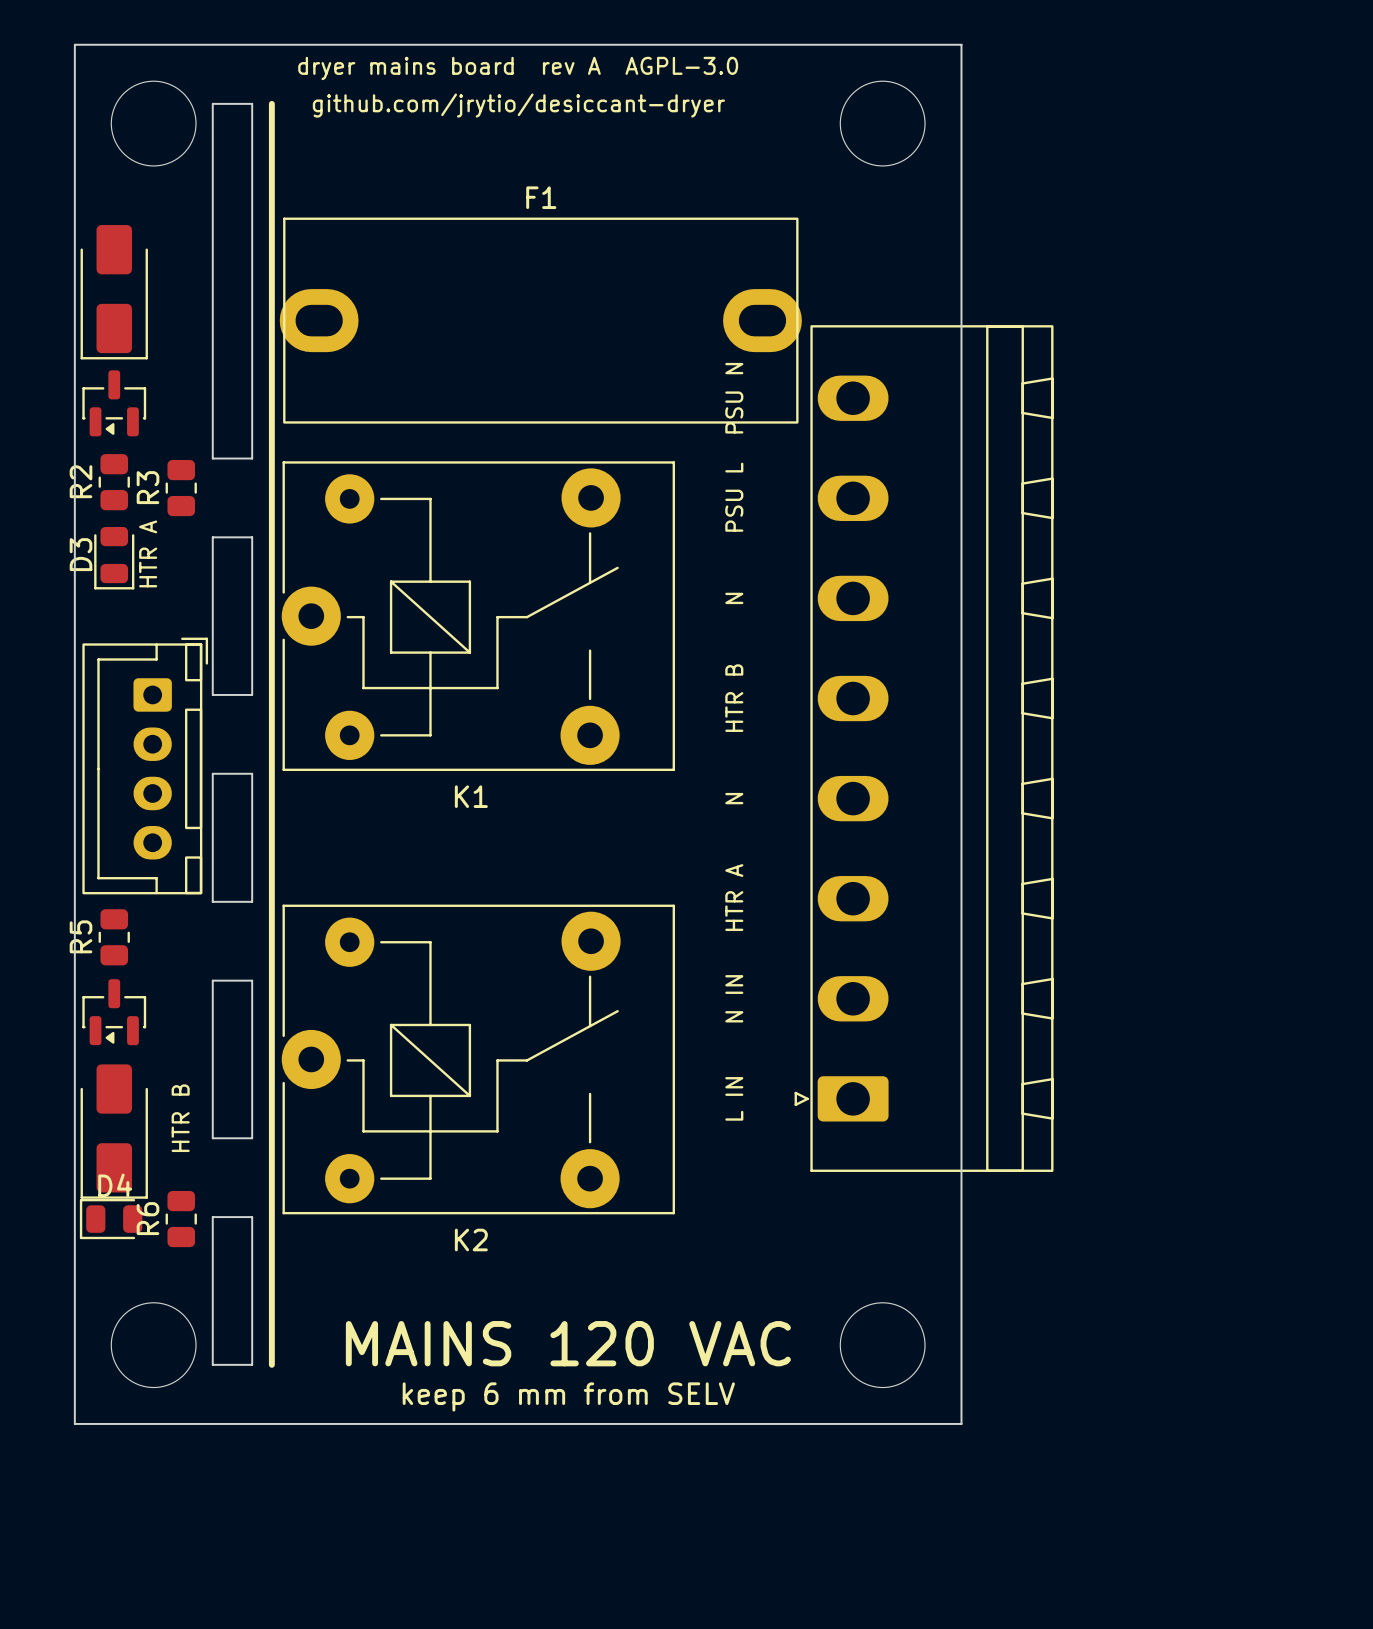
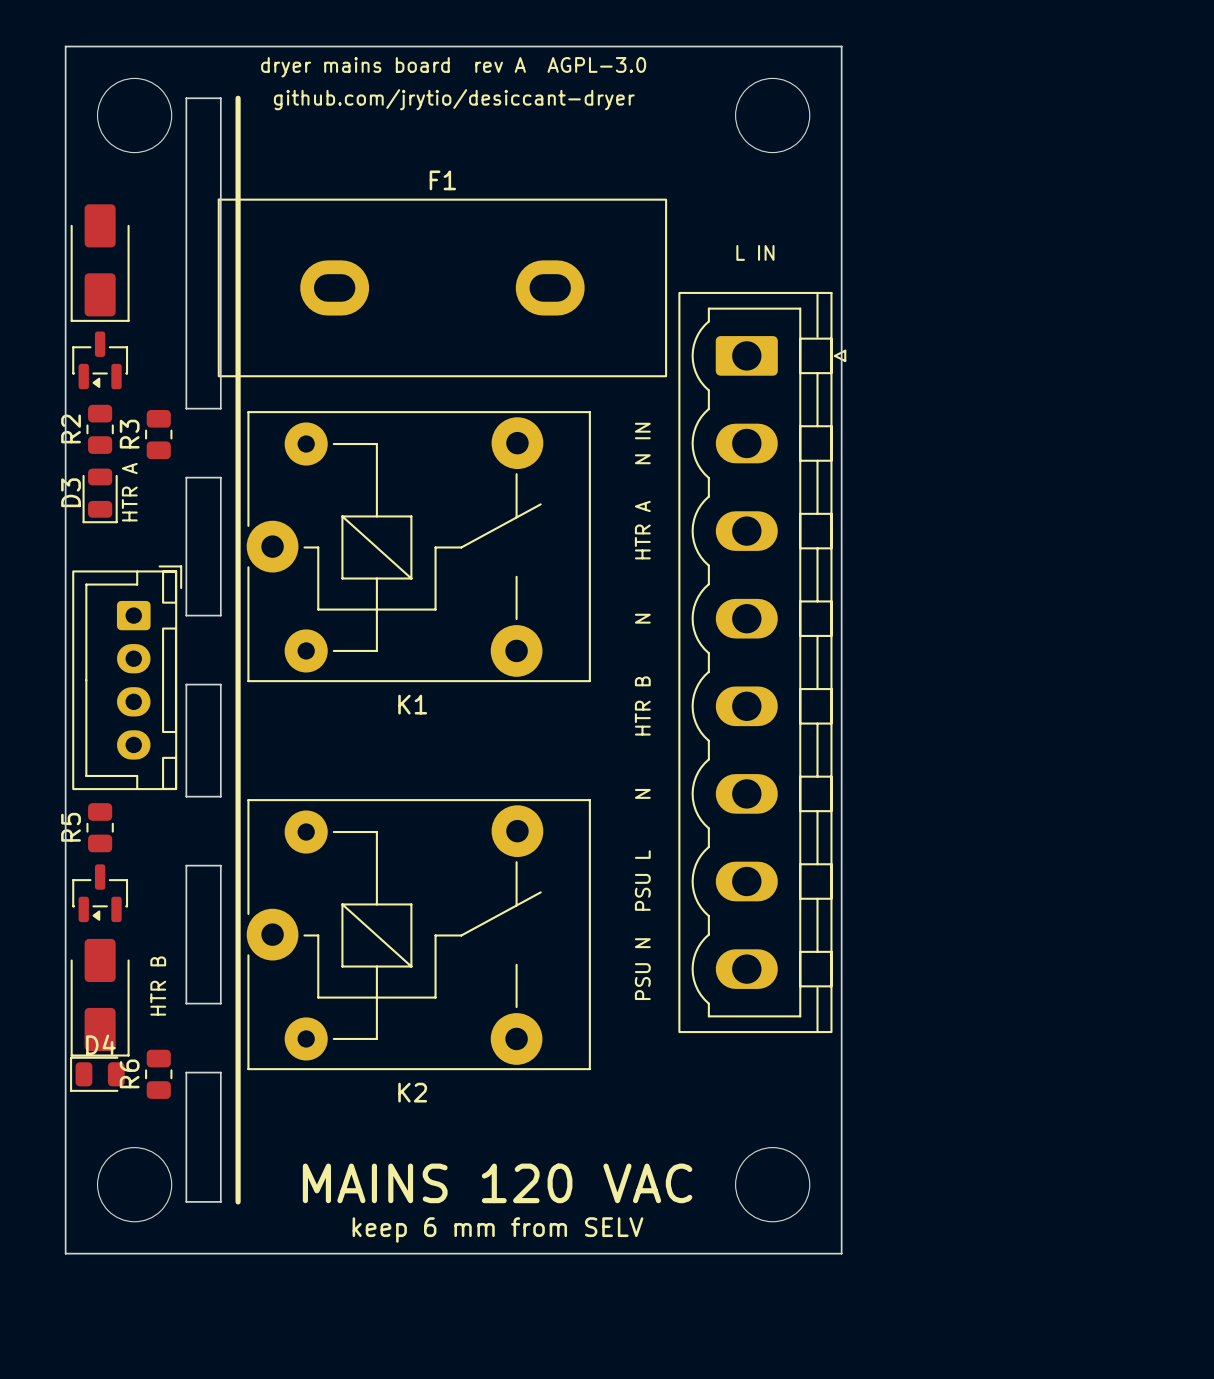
F1 footprint: [279, 217, 802, 424] -> [217, 198, 668, 378]
text: none -> L IN (755, 252)
text: PSU N (734, 398) -> none
text: PSU L (734, 497) -> N IN (642, 443)
text: N (734, 598) -> HTR A (642, 530)
text: HTR B (734, 698) -> N (642, 618)
part: none -> (762, 662)
part: (924, 748) -> none
text: N (734, 798) -> HTR B (642, 705)
text: HTR A (734, 897) -> N (642, 793)
text: N IN (734, 998) -> PSU L (642, 880)
text: L IN (734, 1098) -> PSU N (642, 969)

